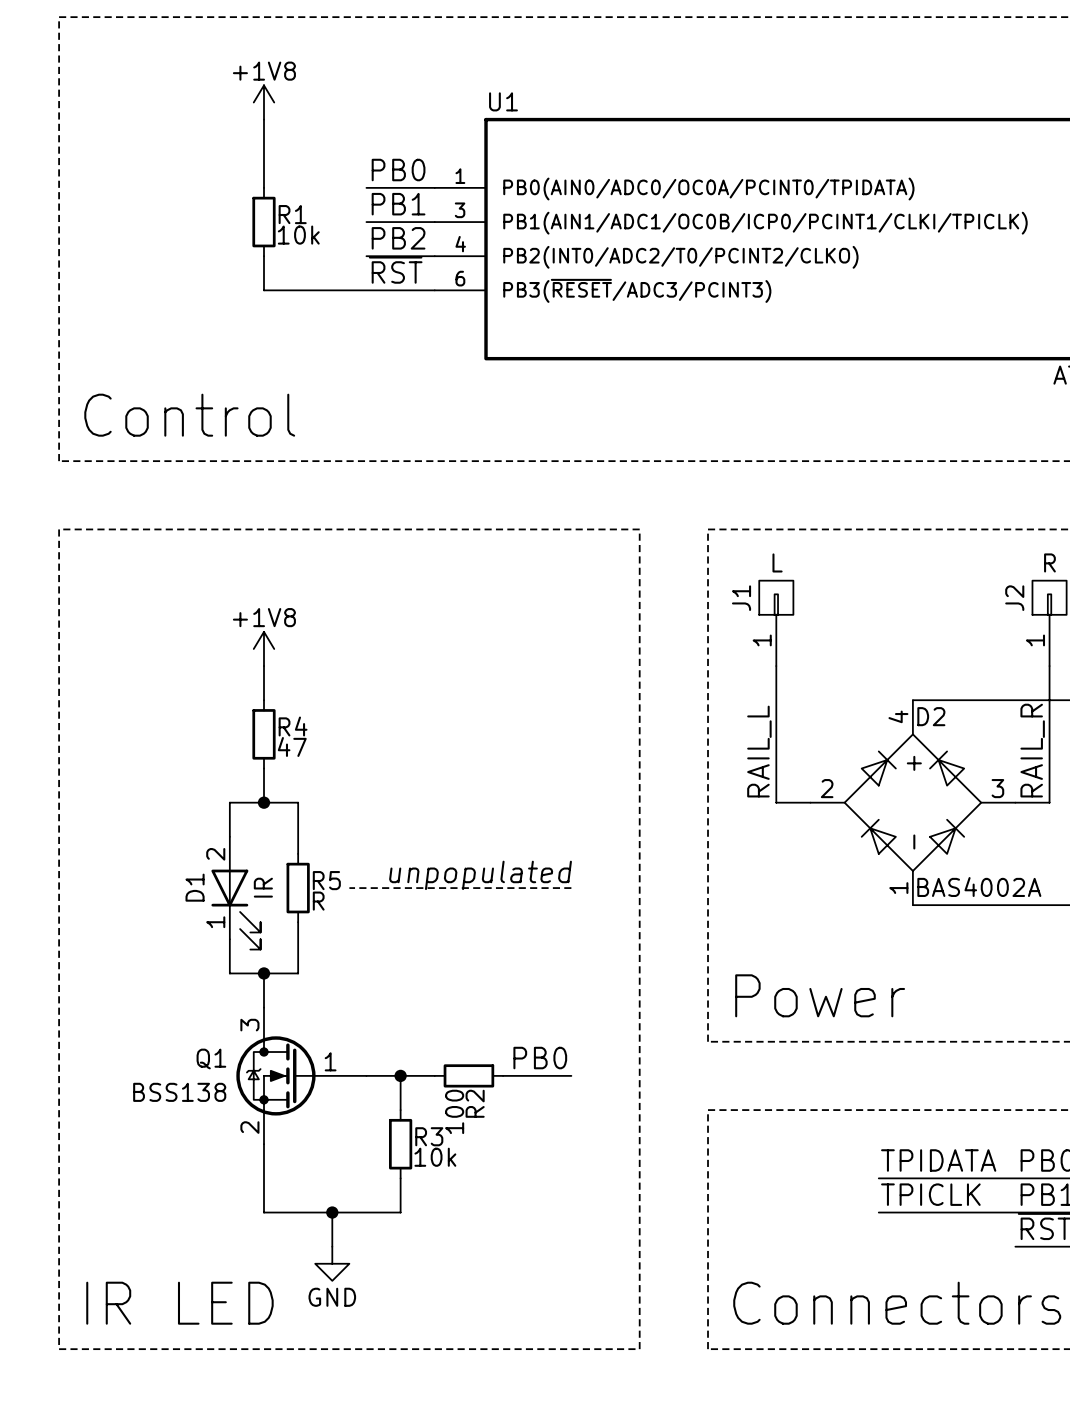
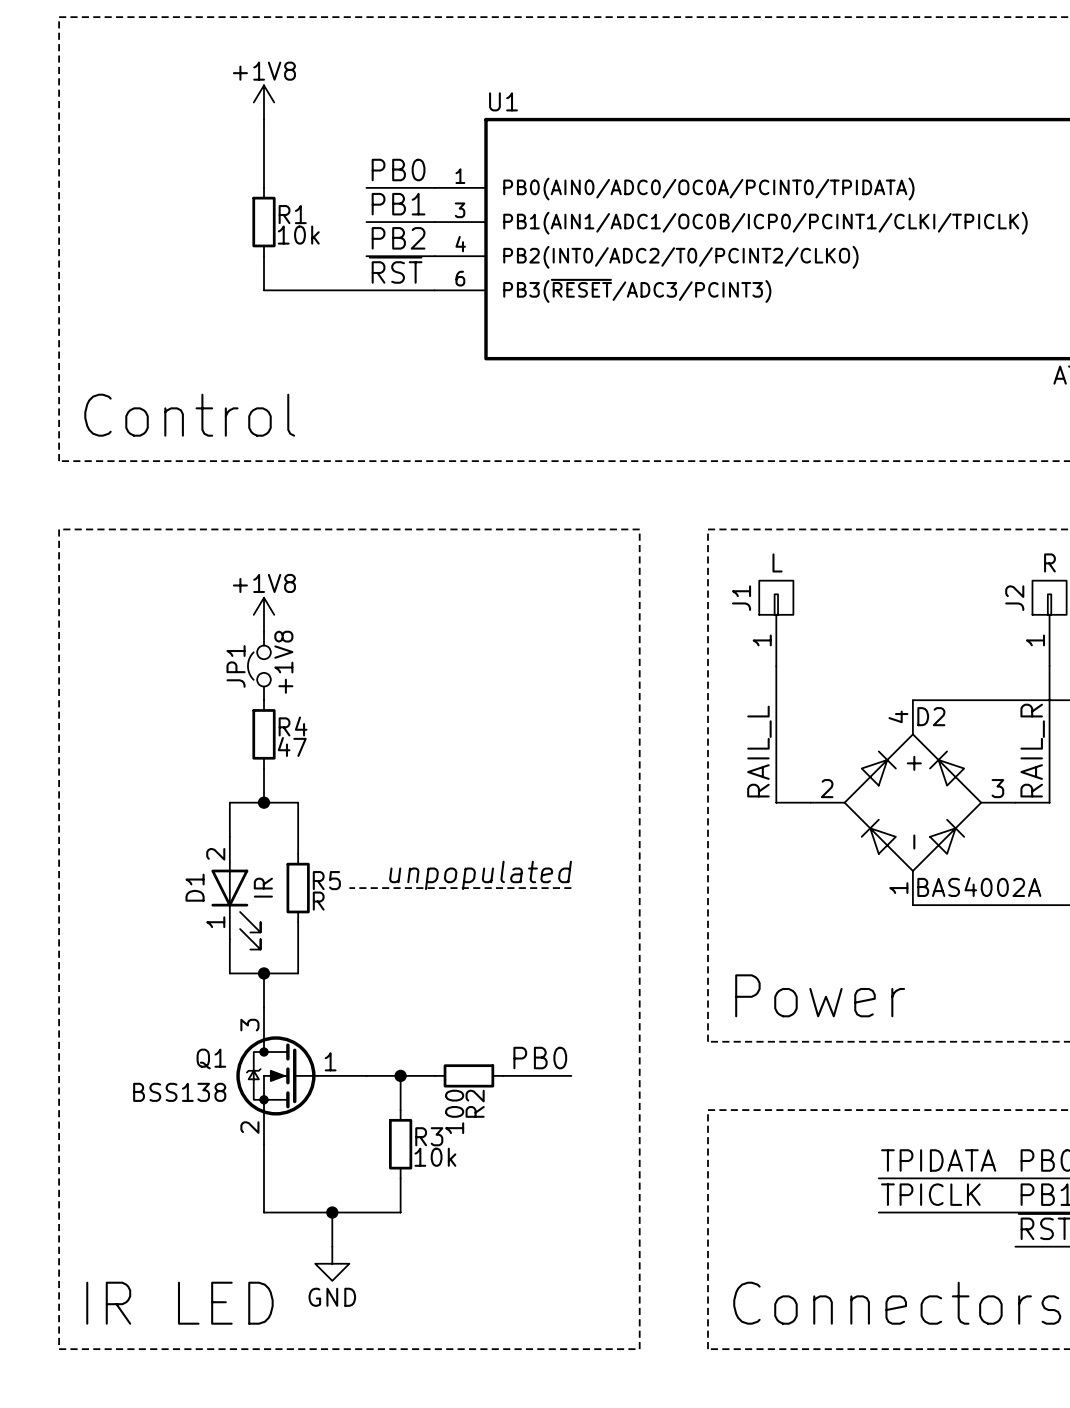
power symbol position: +1V8 (264, 648) -> +1V8 (264, 614)
JP1: none -> +1V8 (259, 666)
wire: (264, 666) (264, 700) -> none

